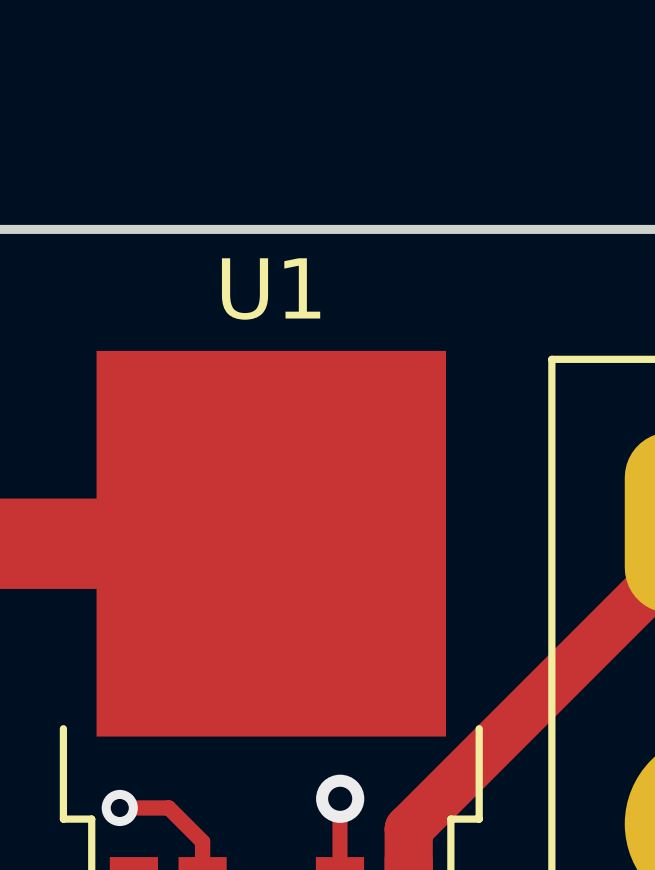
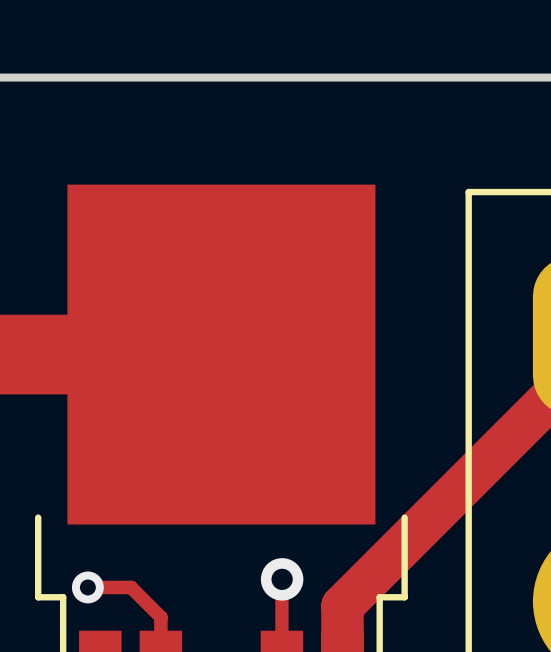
U1 name: U1 (271, 288) -> none

